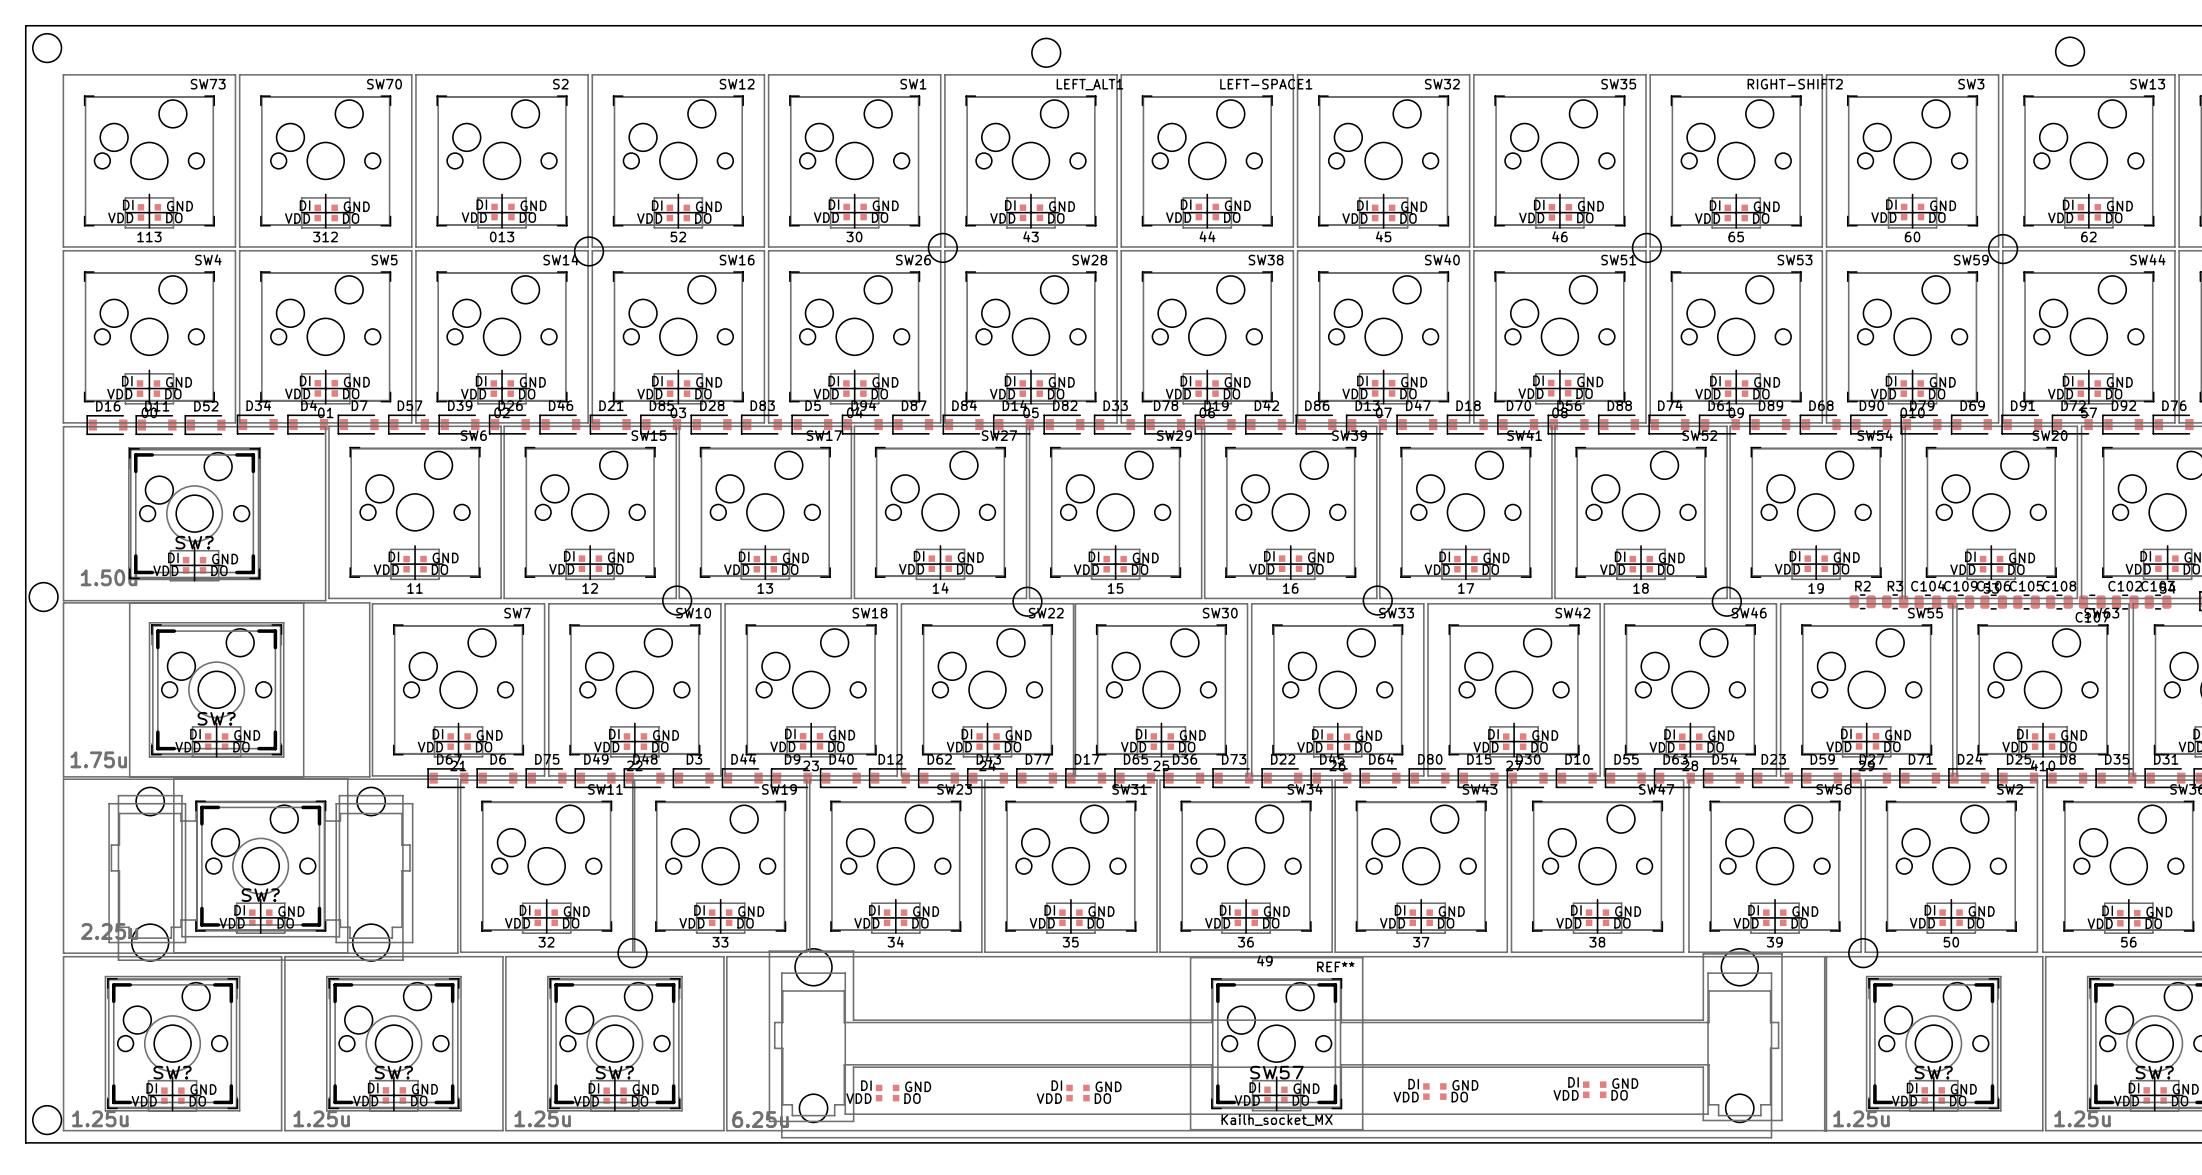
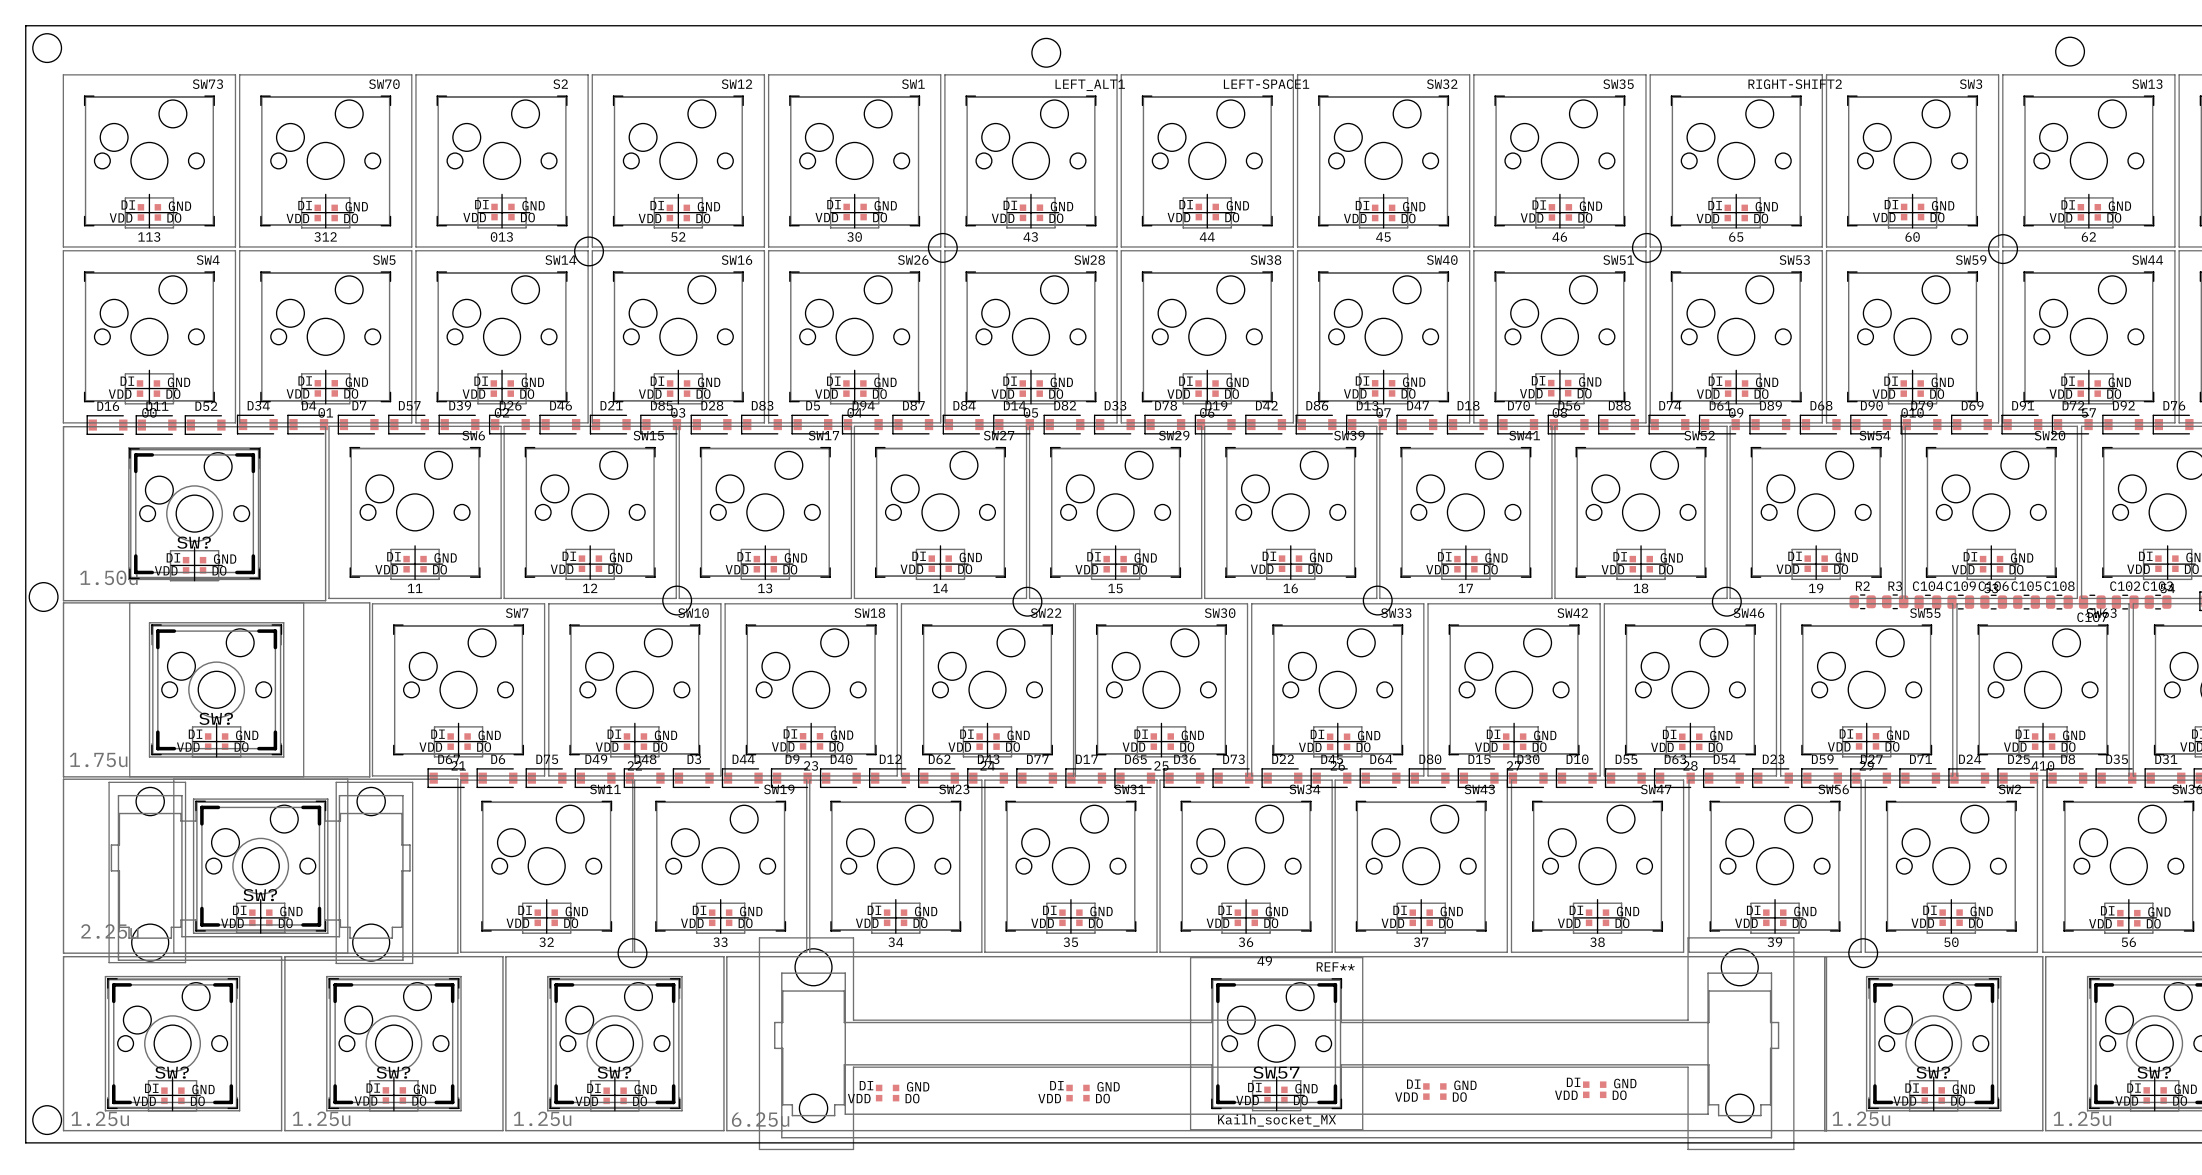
part footprint: [62, 778, 459, 962] -> [62, 778, 459, 965]
SW57 footprint: [726, 948, 1828, 1139] -> [726, 937, 1828, 1151]

